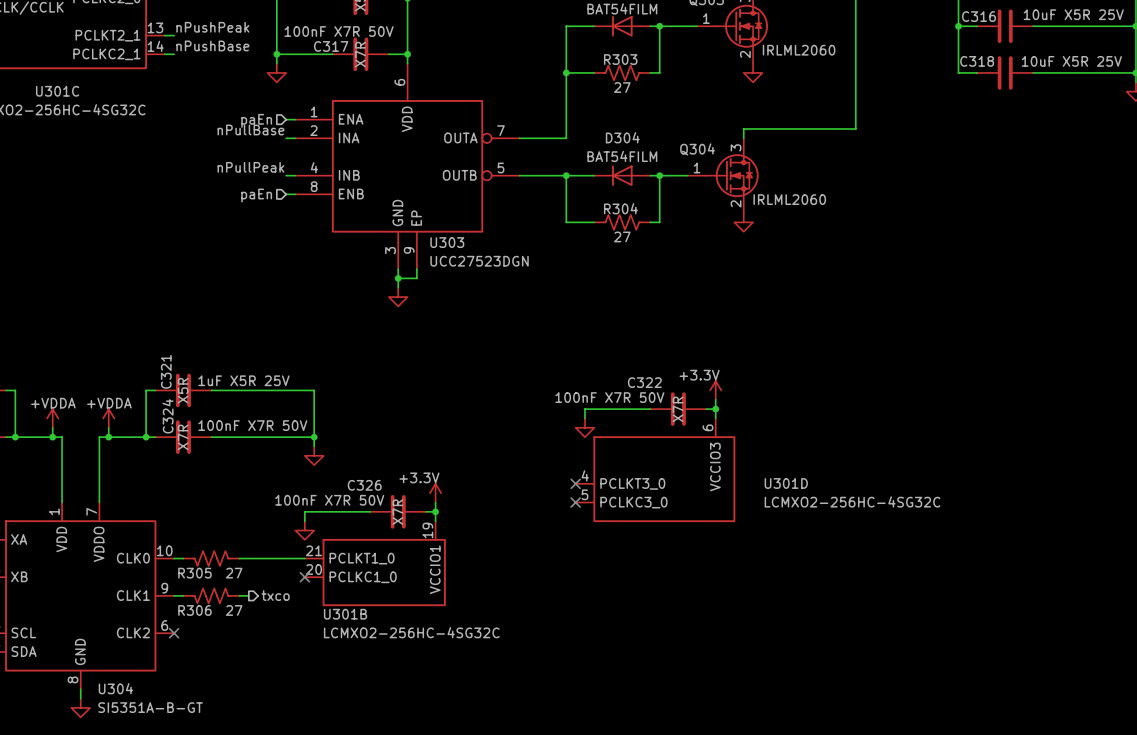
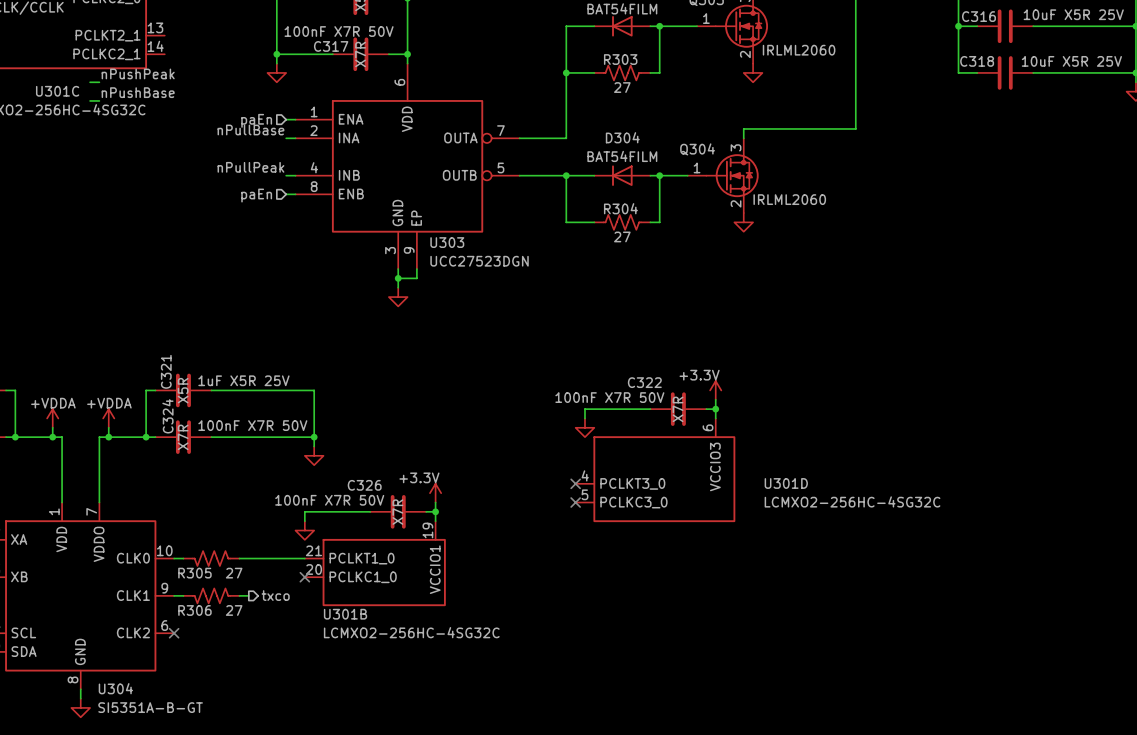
label position: nPushPeak (212, 27) -> nPushPeak (138, 73)
wire: (164, 35) (174, 35) -> (90, 82) (99, 82)
label position: nPushBase (212, 45) -> nPushBase (138, 92)
wire: (164, 54) (174, 54) -> (90, 100) (99, 100)

